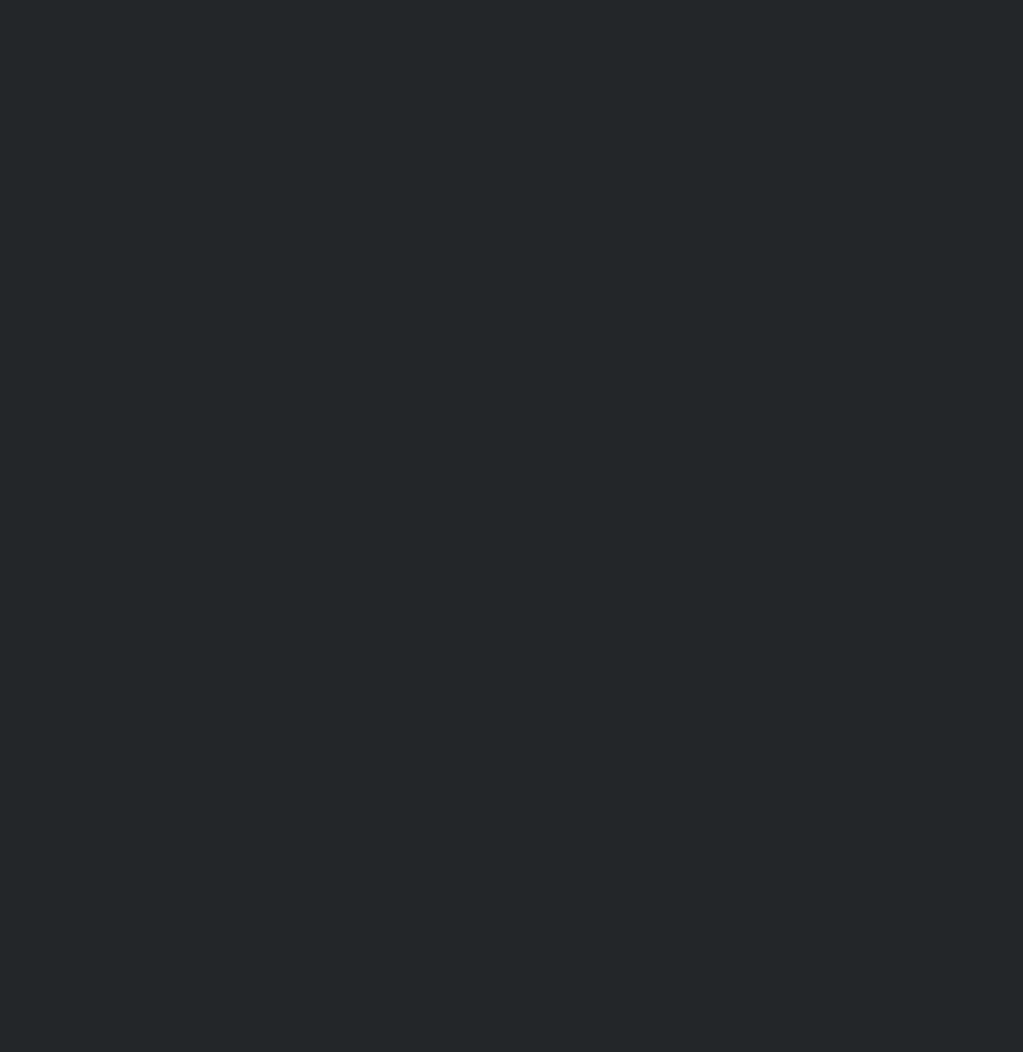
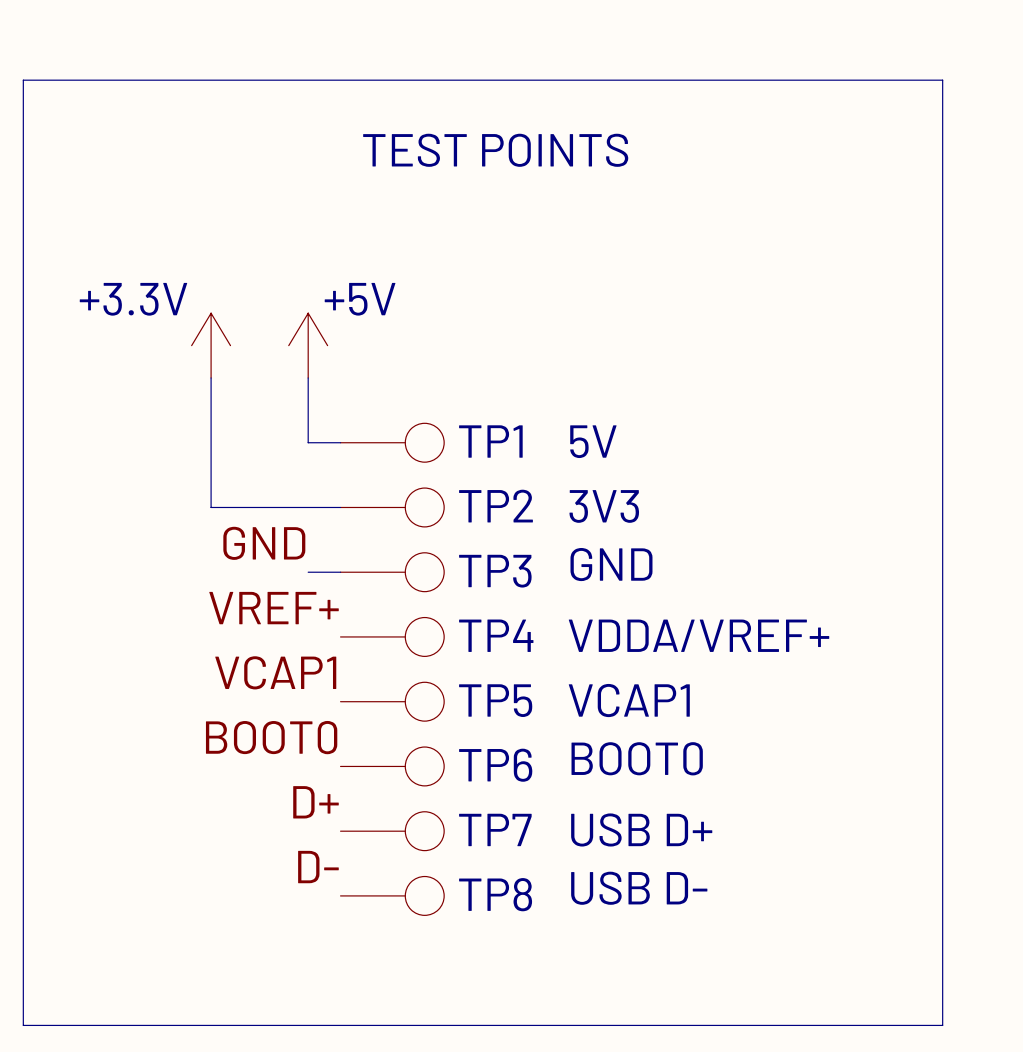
line: none -> (23, 80) (942, 80) (942, 1025) (23, 1025) (23, 80)
text: none -> TEST POINTS (495, 150)
power symbol: none -> +3.3V (211, 345)
power symbol: none -> +5V (308, 345)
wire: none -> (211, 377) (211, 507) (340, 507)
wire: none -> (308, 377) (308, 442) (340, 442)
TP1: none -> 5V (392, 442)
TP2: none -> 3V3 (392, 507)
label: none -> GND (264, 543)
wire: none -> (308, 572) (340, 572)
TP3: none -> GND (392, 572)
label: none -> VREF+ (274, 608)
TP4: none -> VDDA/VREF+ (392, 636)
label: none -> VCAP1 (275, 672)
TP5: none -> VCAP1 (392, 701)
label: none -> BOOT0 (271, 737)
TP6: none -> BOOT0 (392, 766)
label: none -> D+ (315, 802)
TP7: none -> USB D+ (392, 831)
label: none -> D- (318, 867)
TP8: none -> USB D- (392, 895)

